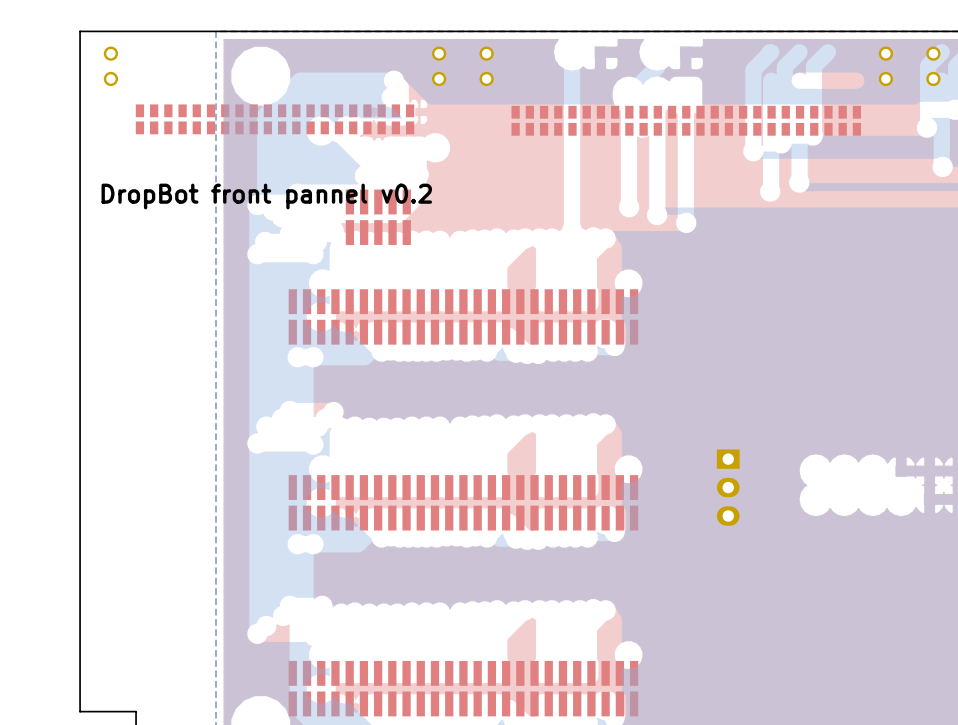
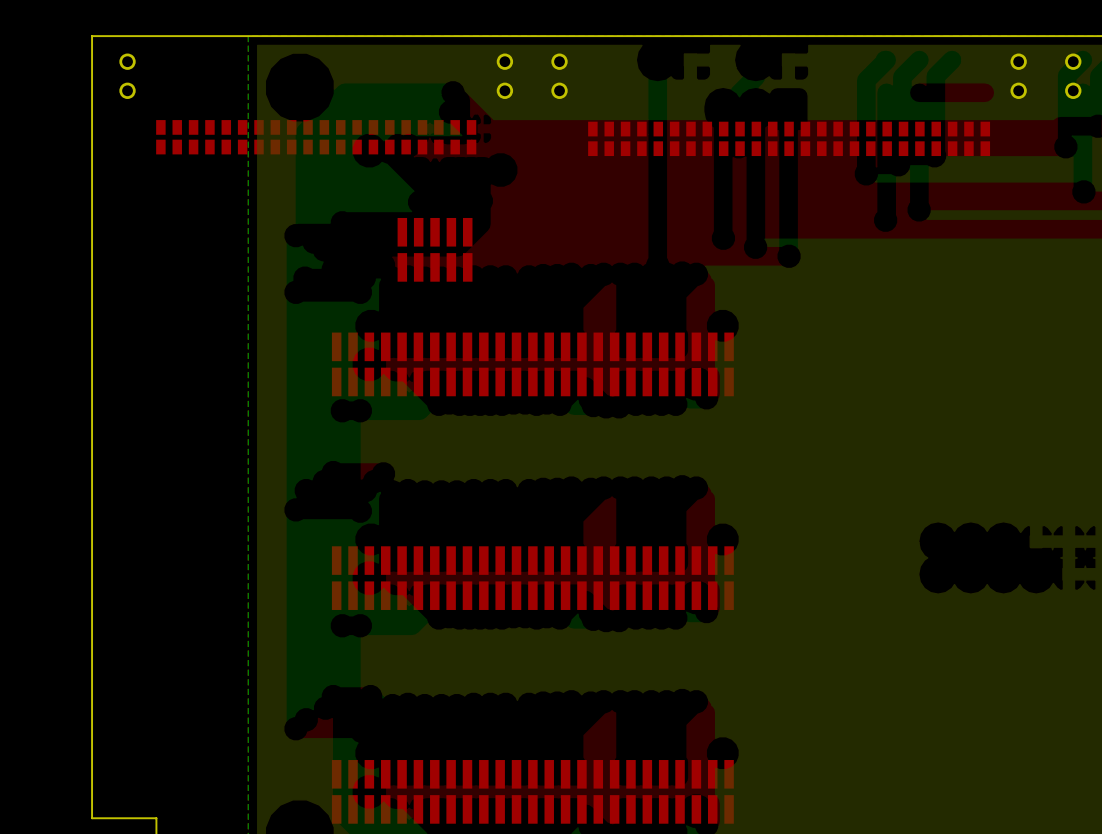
text: DropBot front pannel v0.2 (266, 196) -> none
part: (728, 487) -> none

